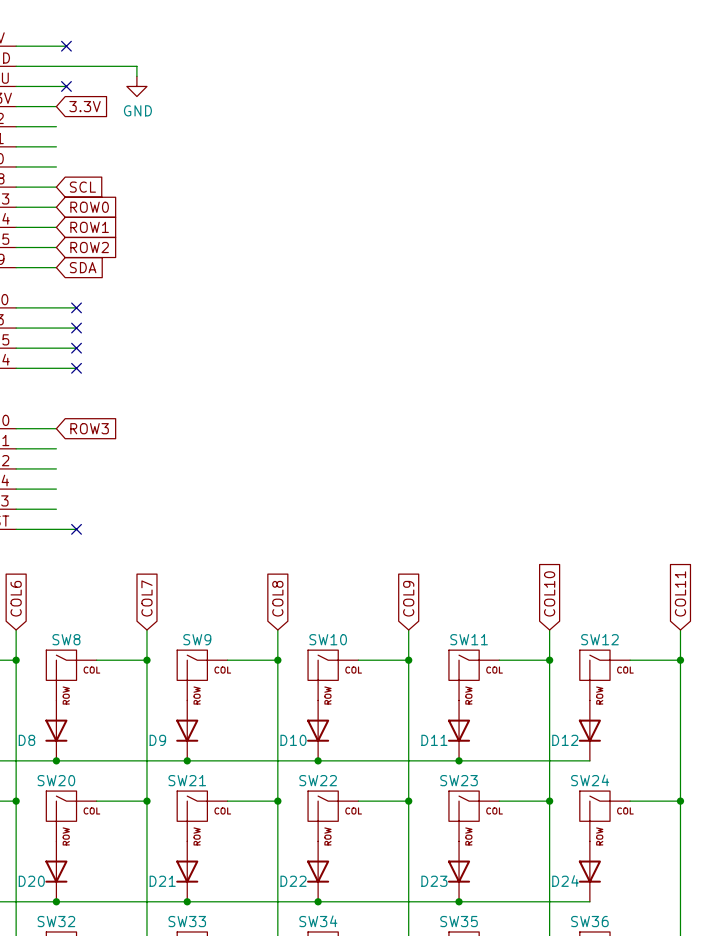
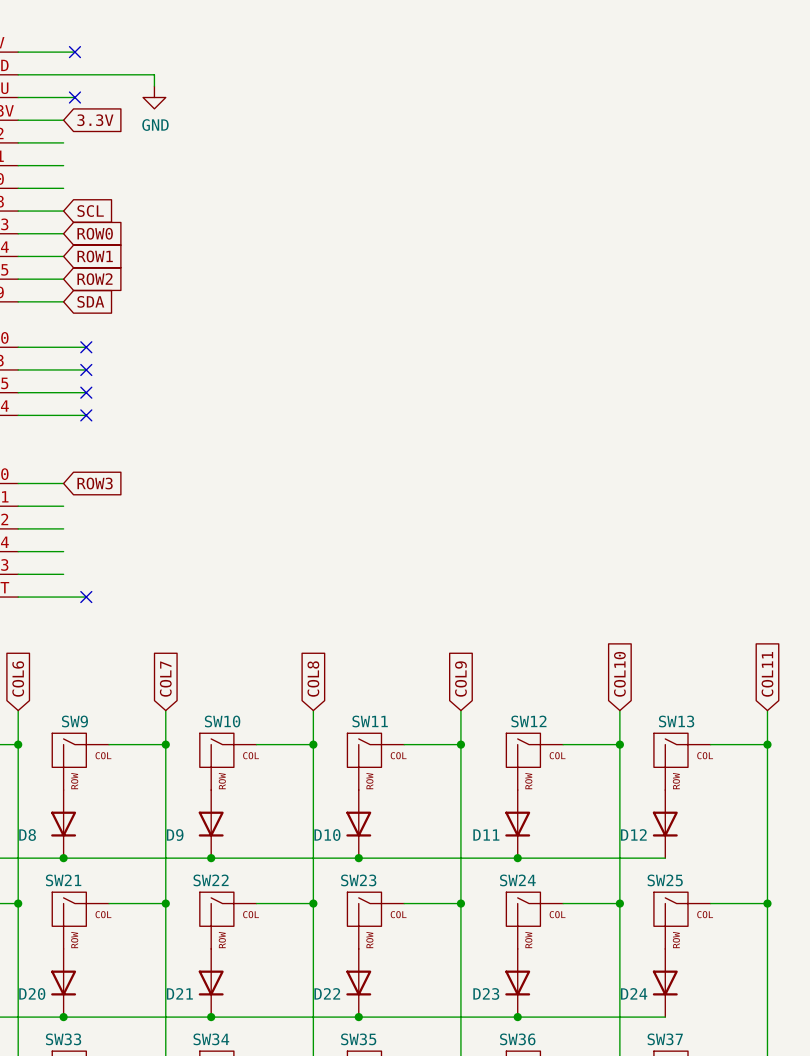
SW8 name: SW8 (66, 639) -> SW9 (74, 721)
SW9 name: SW9 (197, 639) -> SW10 (222, 721)
SW10 name: SW10 (328, 639) -> SW11 (370, 721)
SW11 name: SW11 (469, 639) -> SW12 (528, 721)
SW12 name: SW12 (599, 639) -> SW13 (676, 721)
SW20 name: SW20 (56, 780) -> SW21 (63, 880)
SW21 name: SW21 (187, 780) -> SW22 (211, 880)
SW22 name: SW22 (318, 780) -> SW23 (358, 880)
SW23 name: SW23 (459, 780) -> SW24 (517, 880)
SW24 name: SW24 (590, 780) -> SW25 (665, 880)
SW32 name: SW32 (56, 921) -> SW33 (63, 1039)
SW33 name: SW33 (187, 921) -> SW34 (211, 1039)
SW34 name: SW34 (318, 921) -> SW35 (358, 1039)
SW35 name: SW35 (459, 921) -> SW36 (517, 1039)
SW36 name: SW36 (589, 921) -> SW37 (665, 1039)

